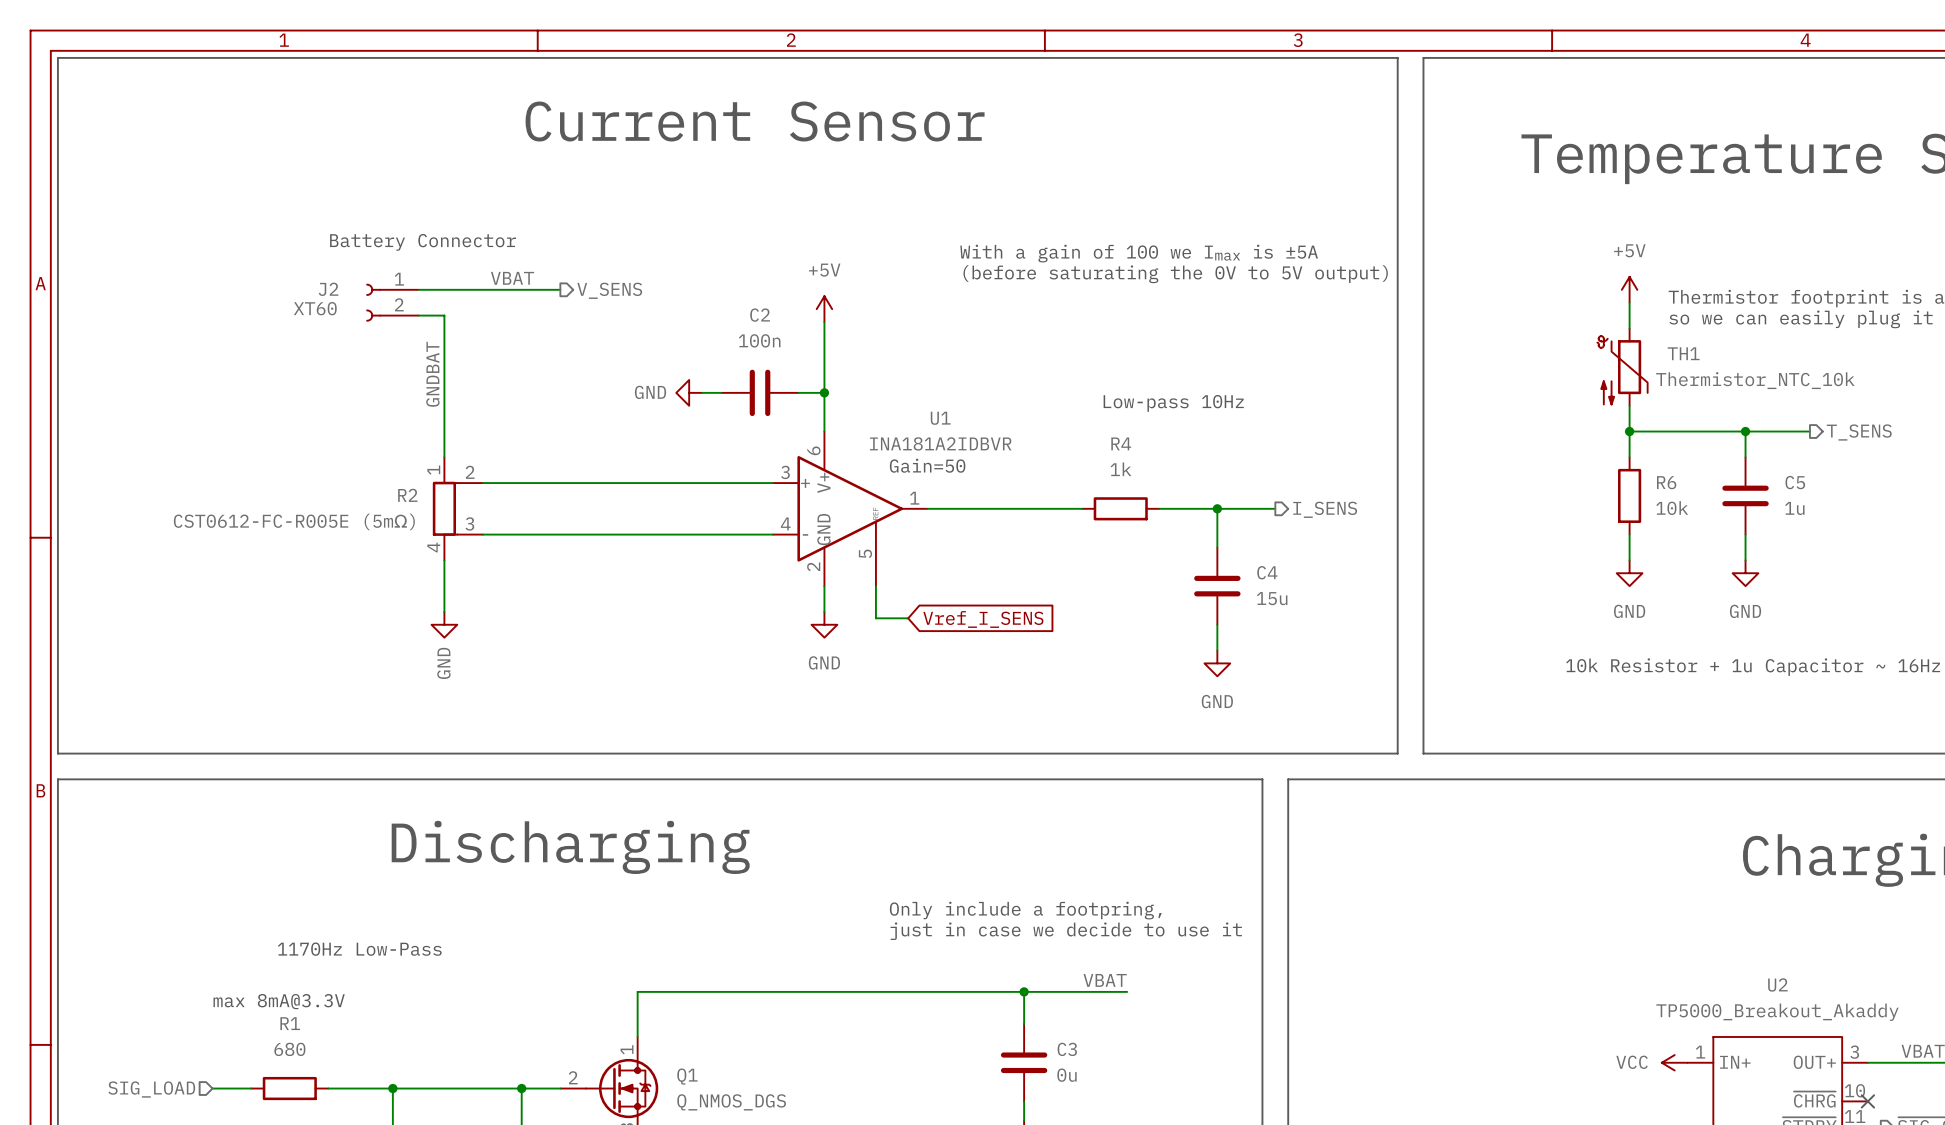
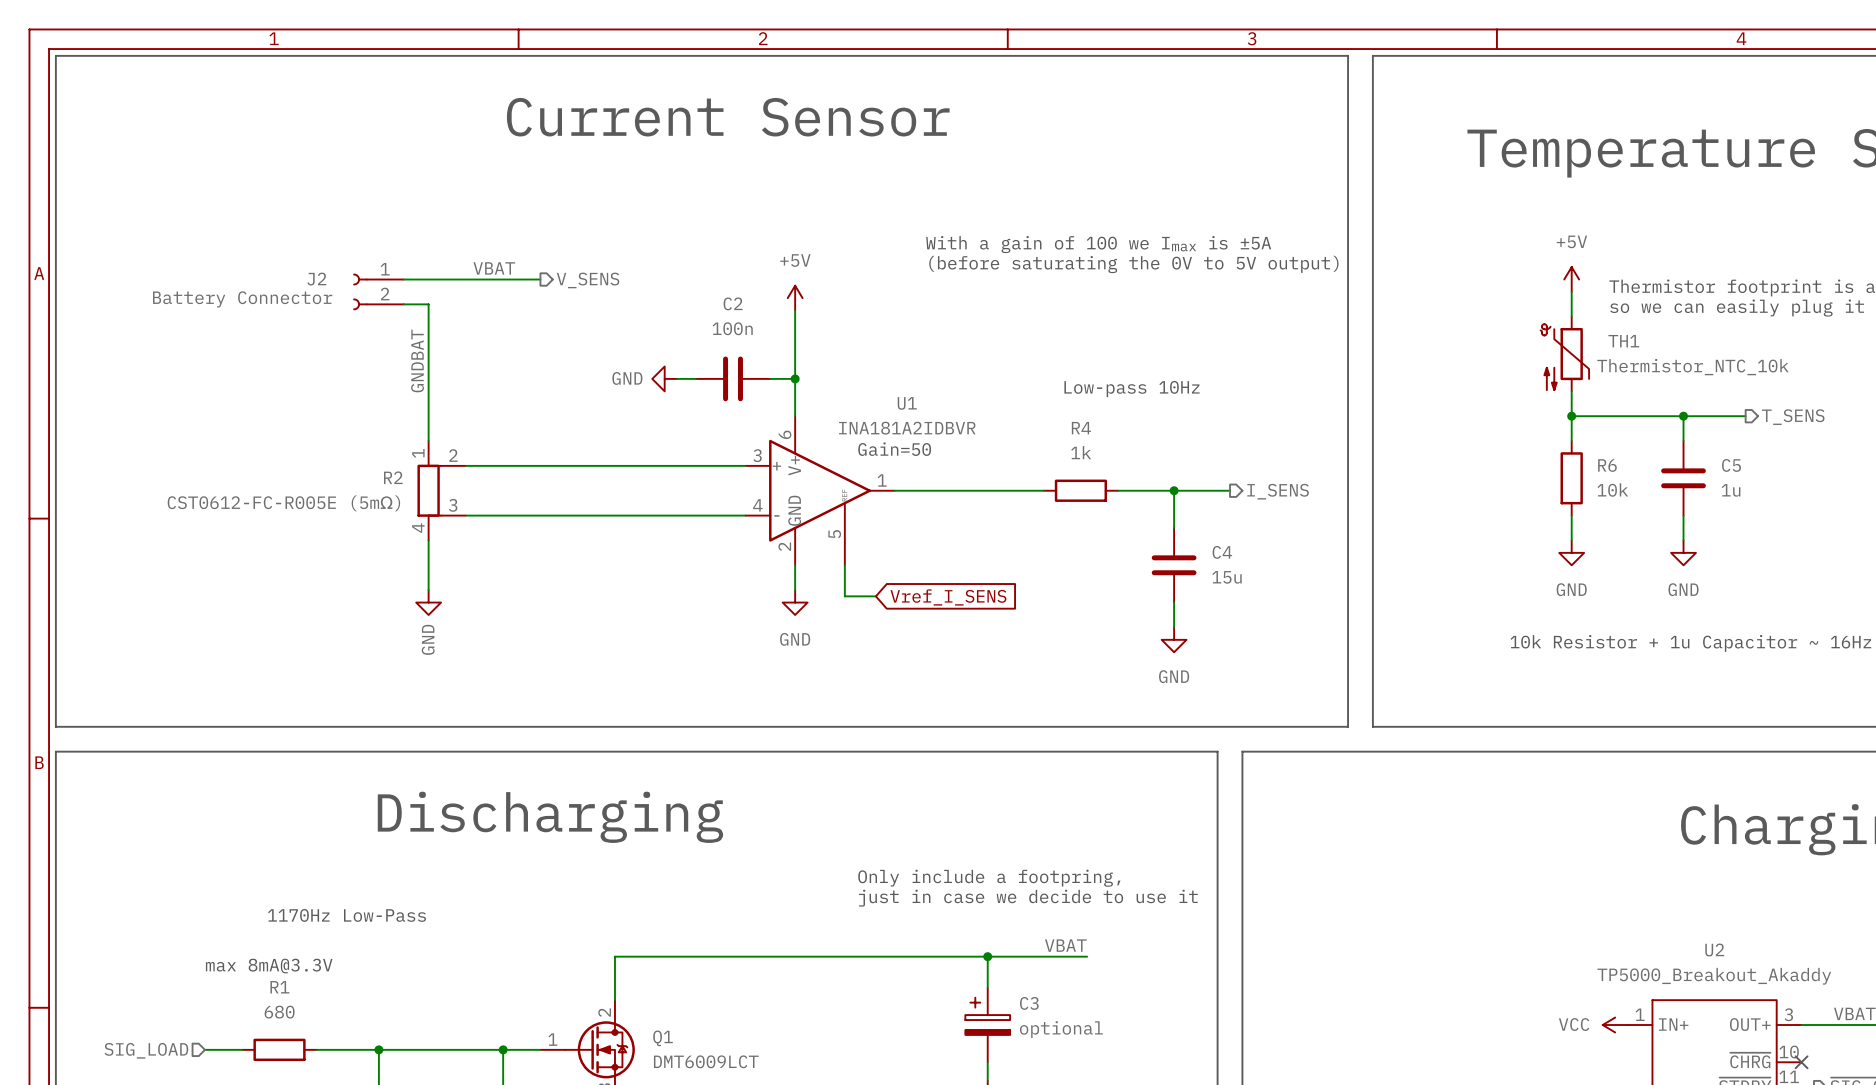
text: Battery Connector (423, 242) -> none
J2 value: XT60 (315, 308) -> Battery Connector (242, 299)
C3 symbol: [1000, 1024, 1048, 1102] -> [965, 987, 1011, 1063]
Q1 pin number: 1 (627, 1049) -> 2 (604, 1012)
C3 value: 0u (1067, 1075) -> optional (1061, 1029)
Q1 pin number: 2 (573, 1077) -> 1 (552, 1039)
Q1 value: Q_NMOS_DGS (731, 1102) -> DMT6009LCT (706, 1061)

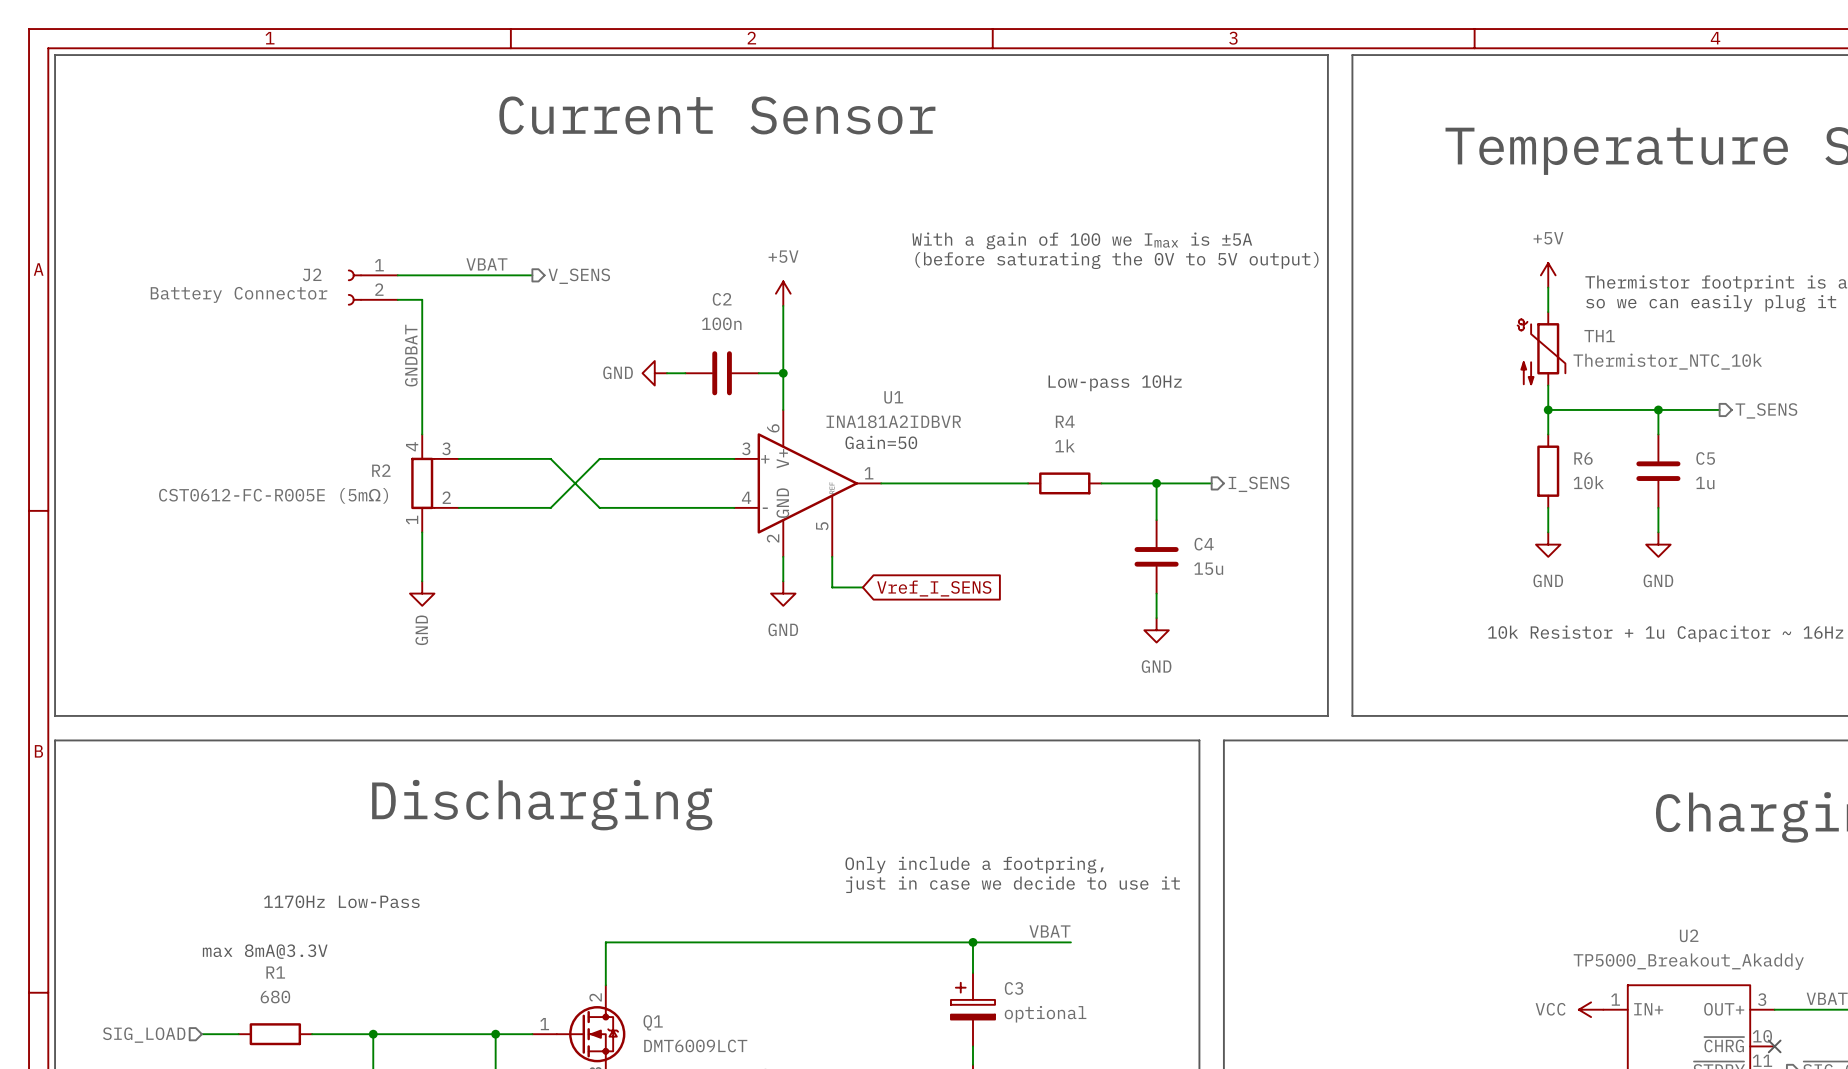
wire: (559, 465) (608, 465) -> (550, 458) (599, 507)
R2 flip: as is (429, 490) -> up-down (422, 483)
wire: (559, 515) (608, 515) -> (550, 507) (599, 458)

